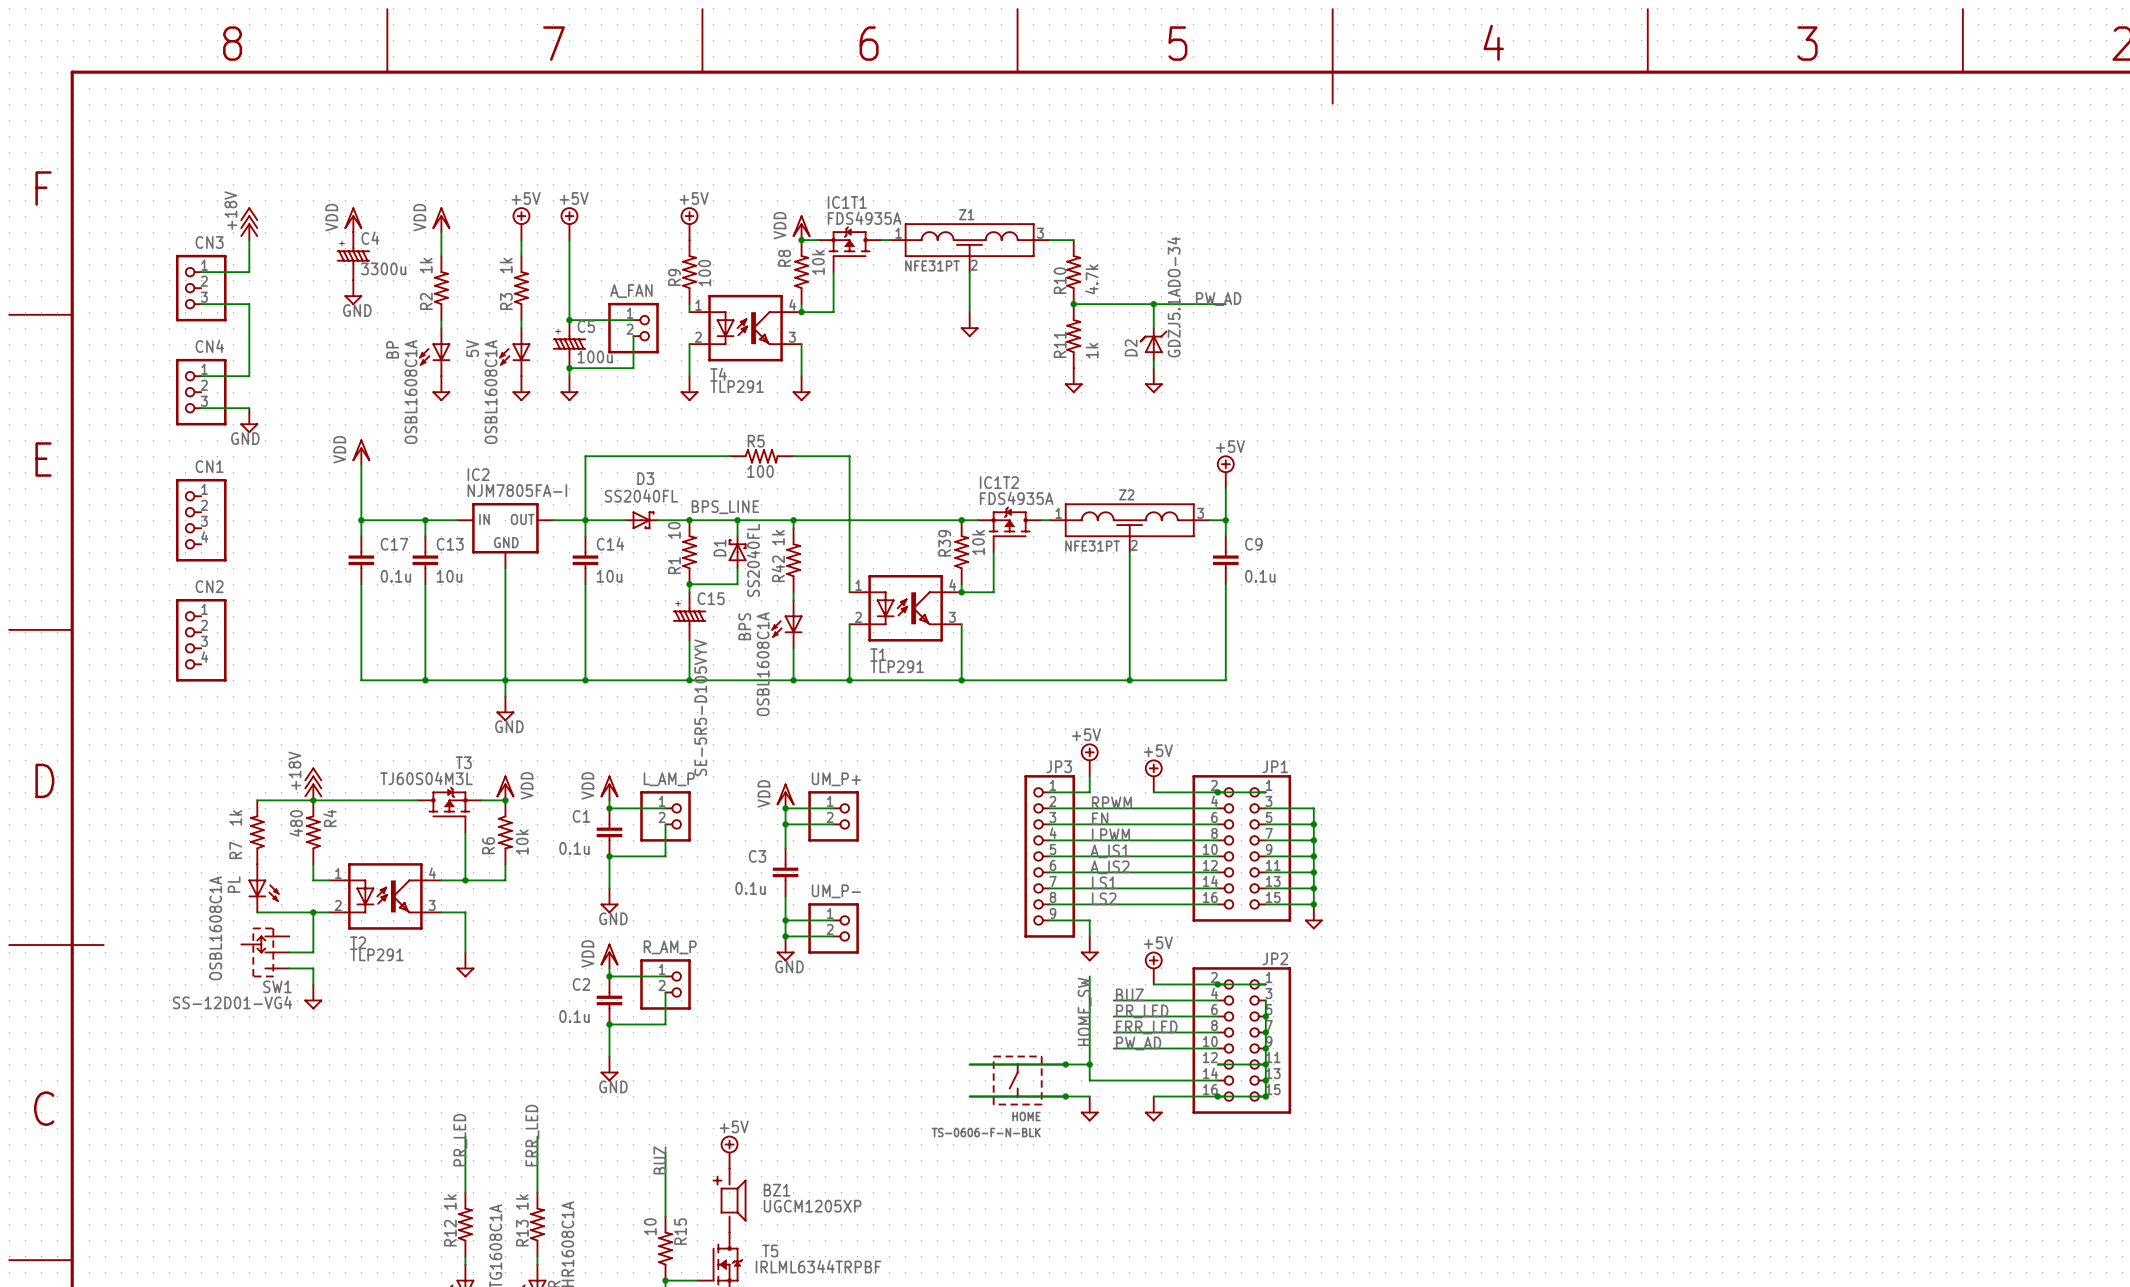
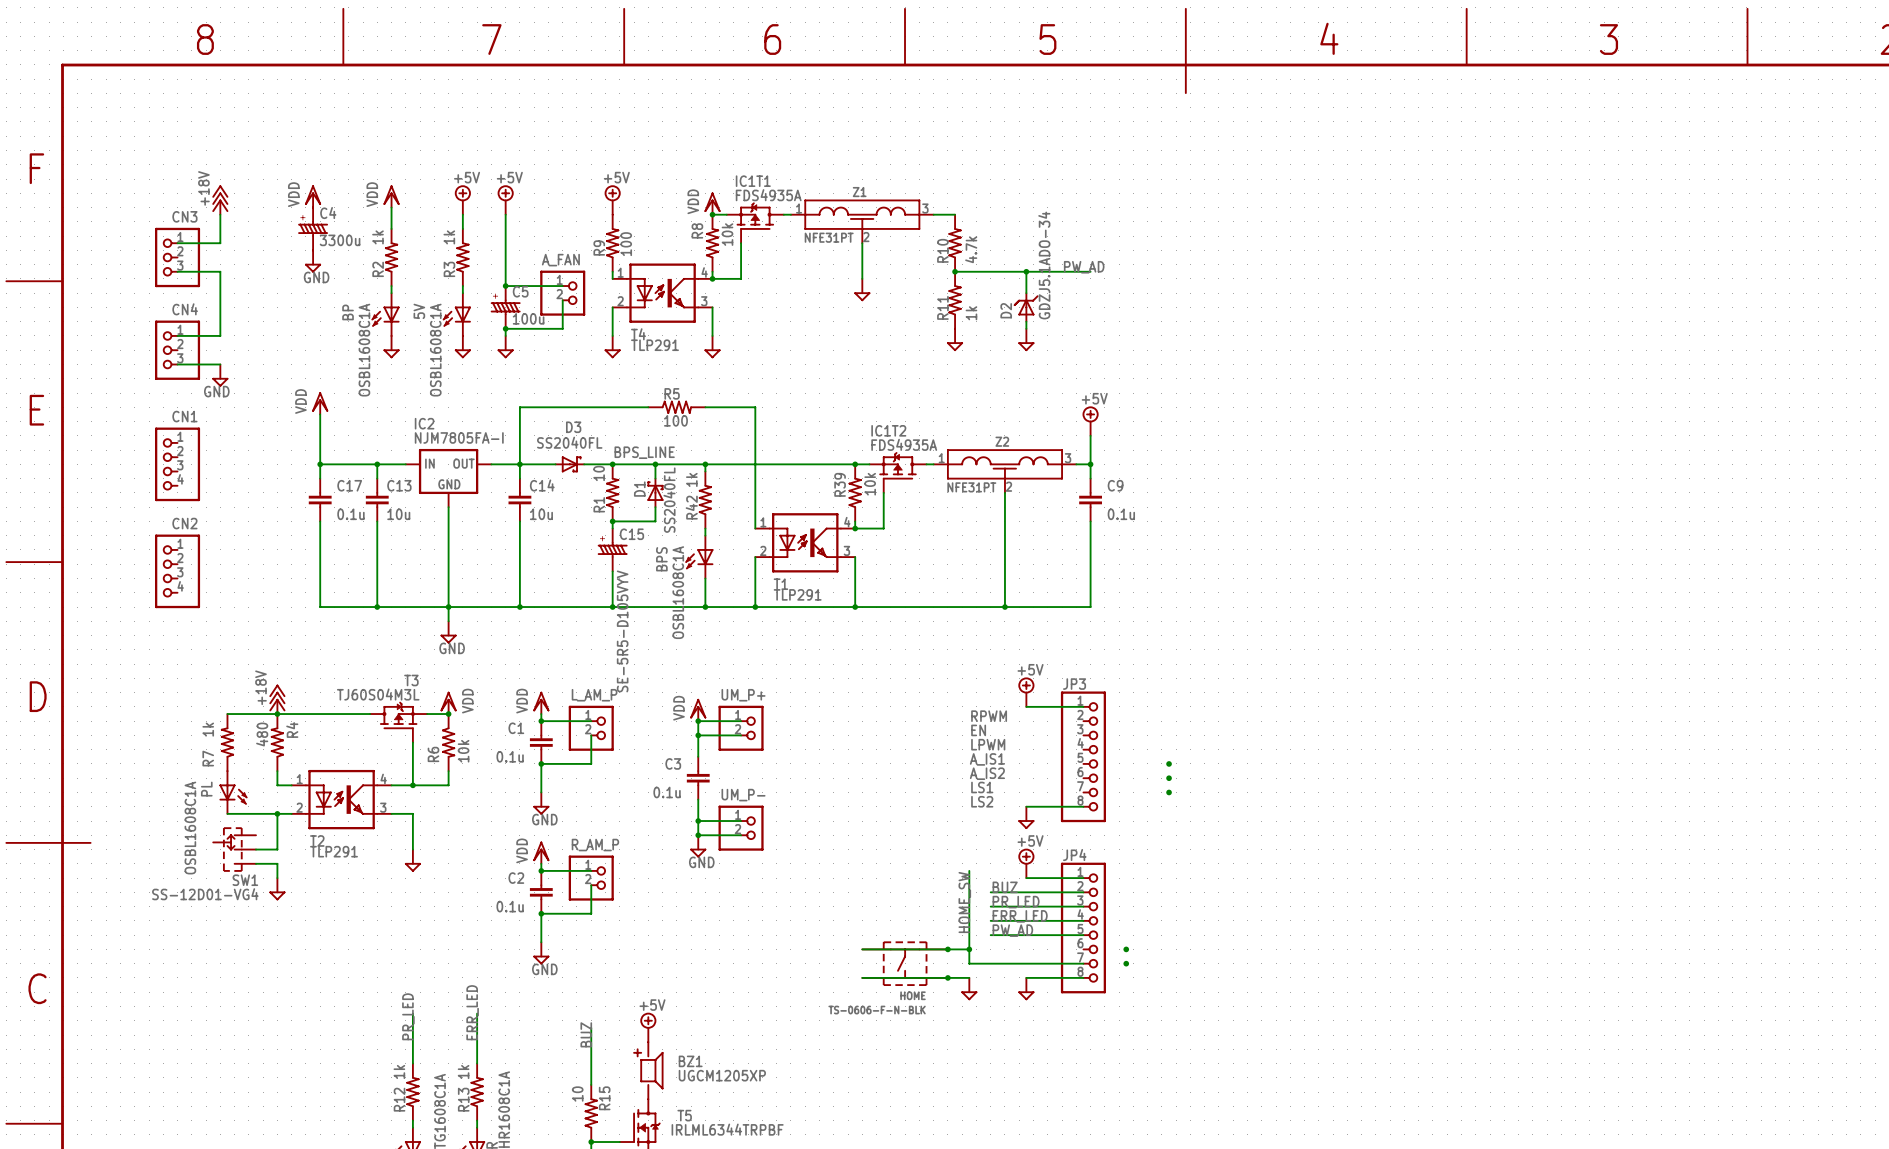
power symbol: +5V (1089, 759) -> none
JP3 name position: JP3 (1059, 766) -> JP3 (1074, 684)
JP3 symbol: [1024, 775, 1075, 938] -> [1060, 691, 1106, 823]
wire: (1089, 776) (1089, 792) (1049, 792) -> none
wire: (1217, 792) (1265, 792) -> none
junction: (1217, 792) -> none
wire: (1049, 808) (1217, 808) -> none
wire: (1265, 808) (1313, 808) (1313, 904) (1265, 904) -> none
wire: (1049, 824) (1217, 824) -> none
wire: (1265, 824) (1313, 824) -> none
junction: (1313, 824) -> none
wire: (1049, 840) (1217, 840) -> none
wire: (1265, 840) (1313, 840) -> none
junction: (1313, 840) -> none
JP1: (1241, 848) -> none
wire: (1049, 856) (1217, 856) -> none
wire: (1265, 856) (1313, 856) -> none
wire: (1049, 872) (1217, 872) -> none
wire: (1265, 872) (1313, 872) -> none
wire: (1049, 888) (1217, 888) -> none
wire: (1265, 888) (1313, 888) -> none
wire: (1049, 904) (1153, 904) -> none
junction: (1313, 904) -> none
power symbol: (1313, 916) -> none
wire: (1049, 920) (1089, 920) (1089, 936) -> none
power symbol position: (1089, 948) -> (1026, 817)
wire: (1217, 984) (1265, 984) -> none
junction: (1217, 984) -> none
wire: (1265, 1000) (1265, 1096) (1217, 1096) -> none
junction: (1265, 1016) -> none
junction: (1265, 1032) -> none
JP4: none -> (1083, 928)
JP2: (1241, 1040) -> none
junction: (1265, 1048) -> none
wire: (1217, 1064) (1265, 1064) -> none
junction: (1217, 1096) -> none
junction: (1265, 1096) -> none

